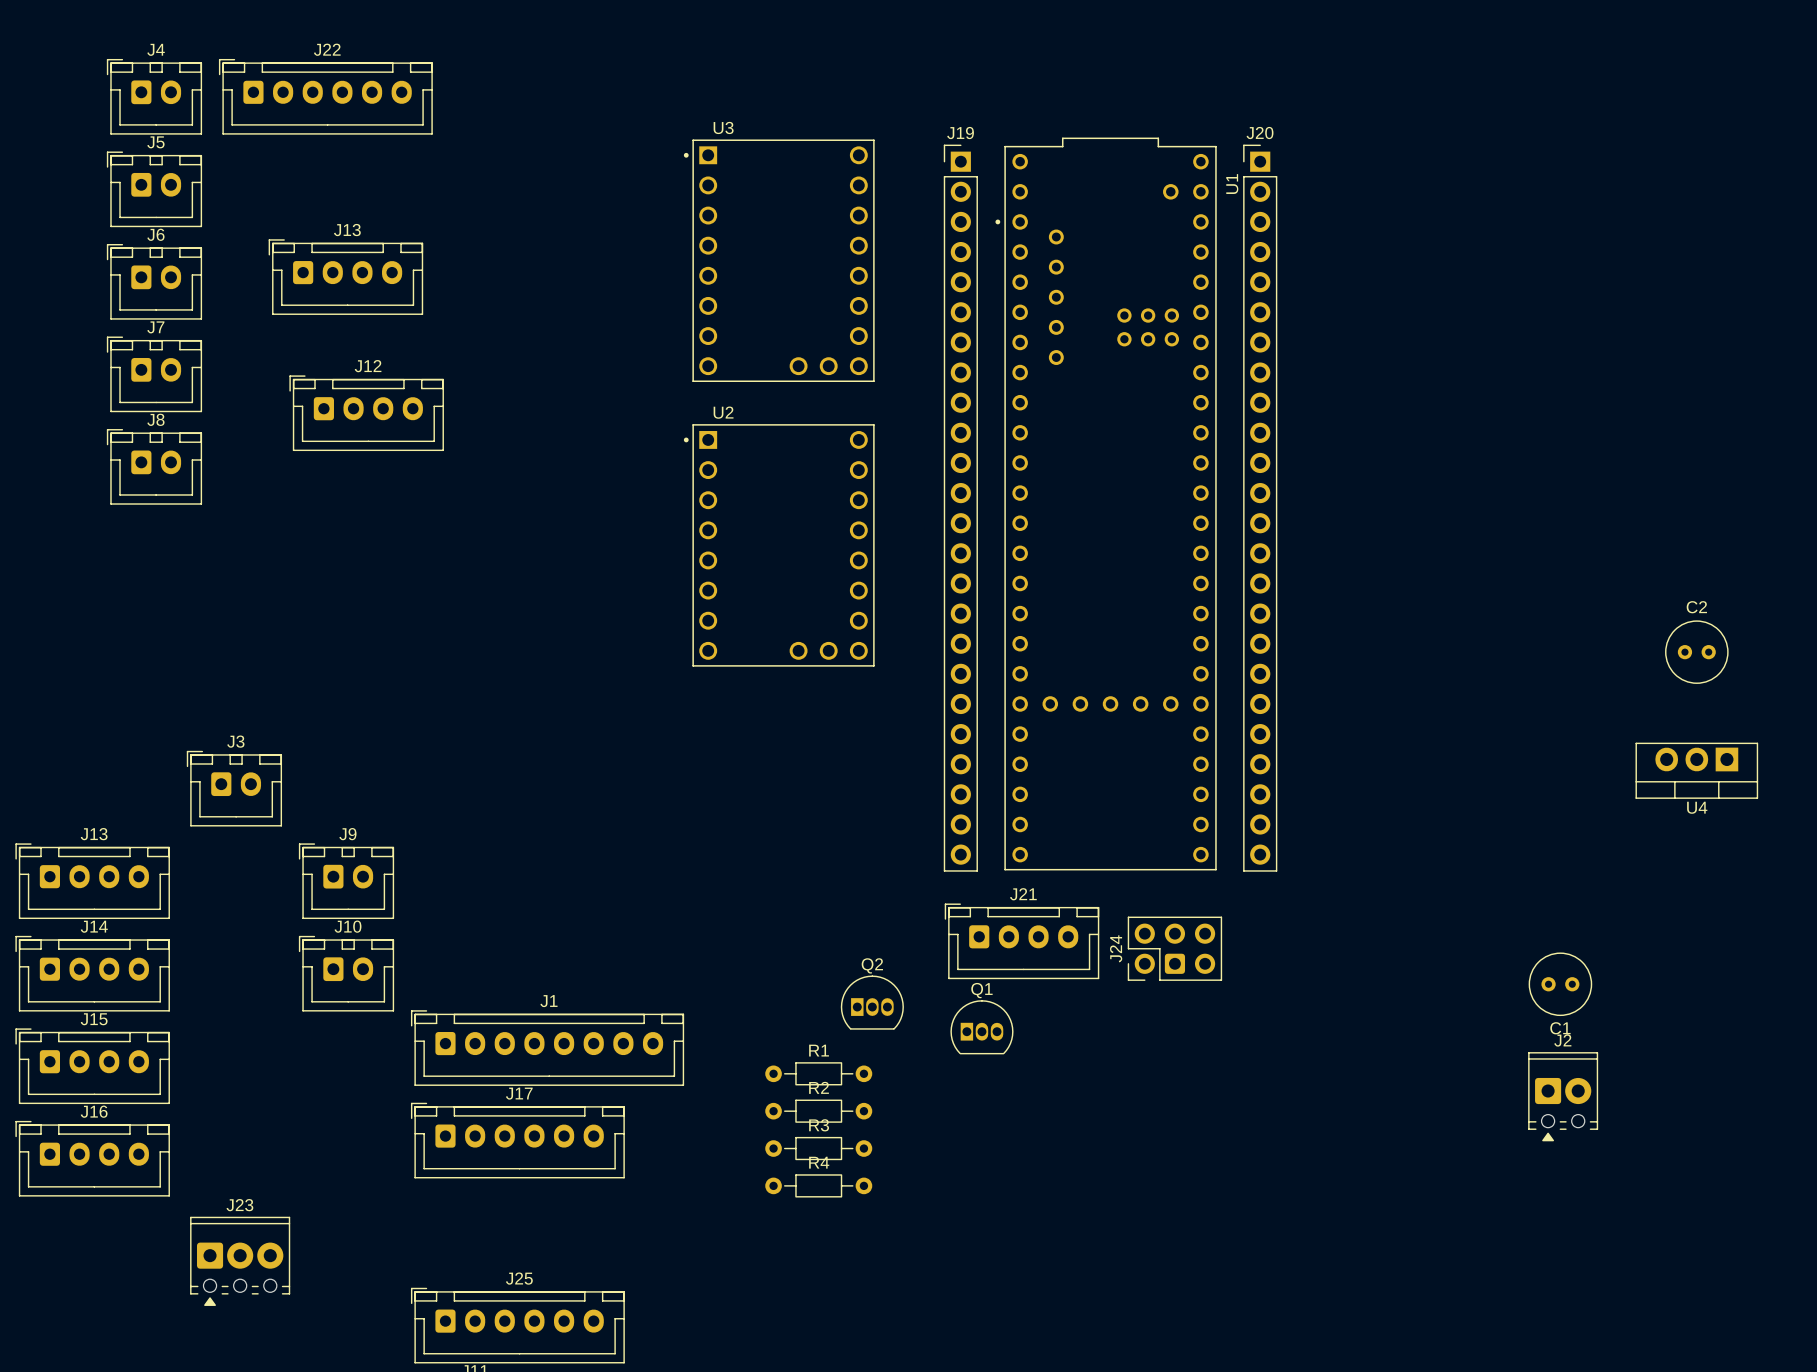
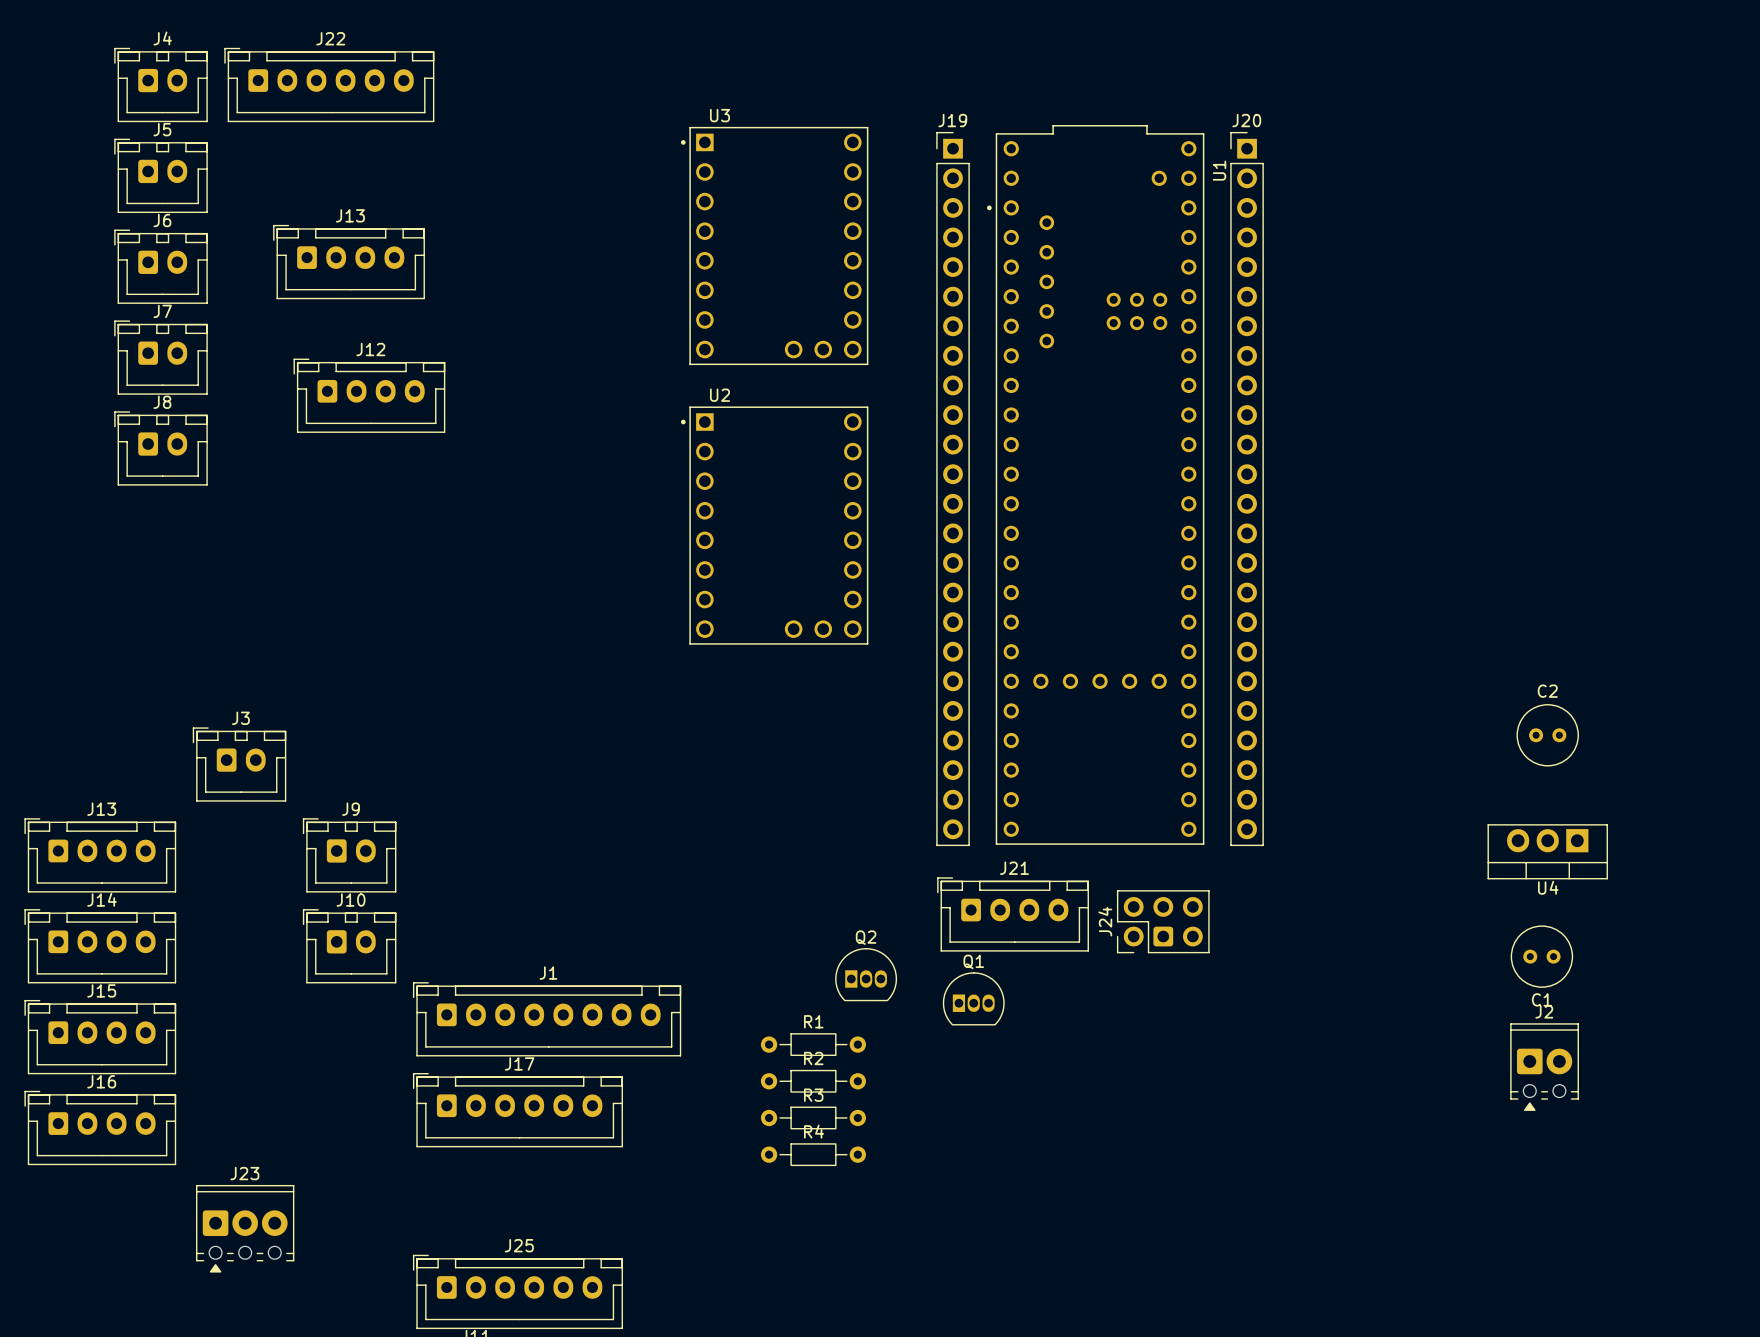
C2 position: (1696, 652) -> (1547, 735)
U4 position: (1696, 770) -> (1547, 851)

